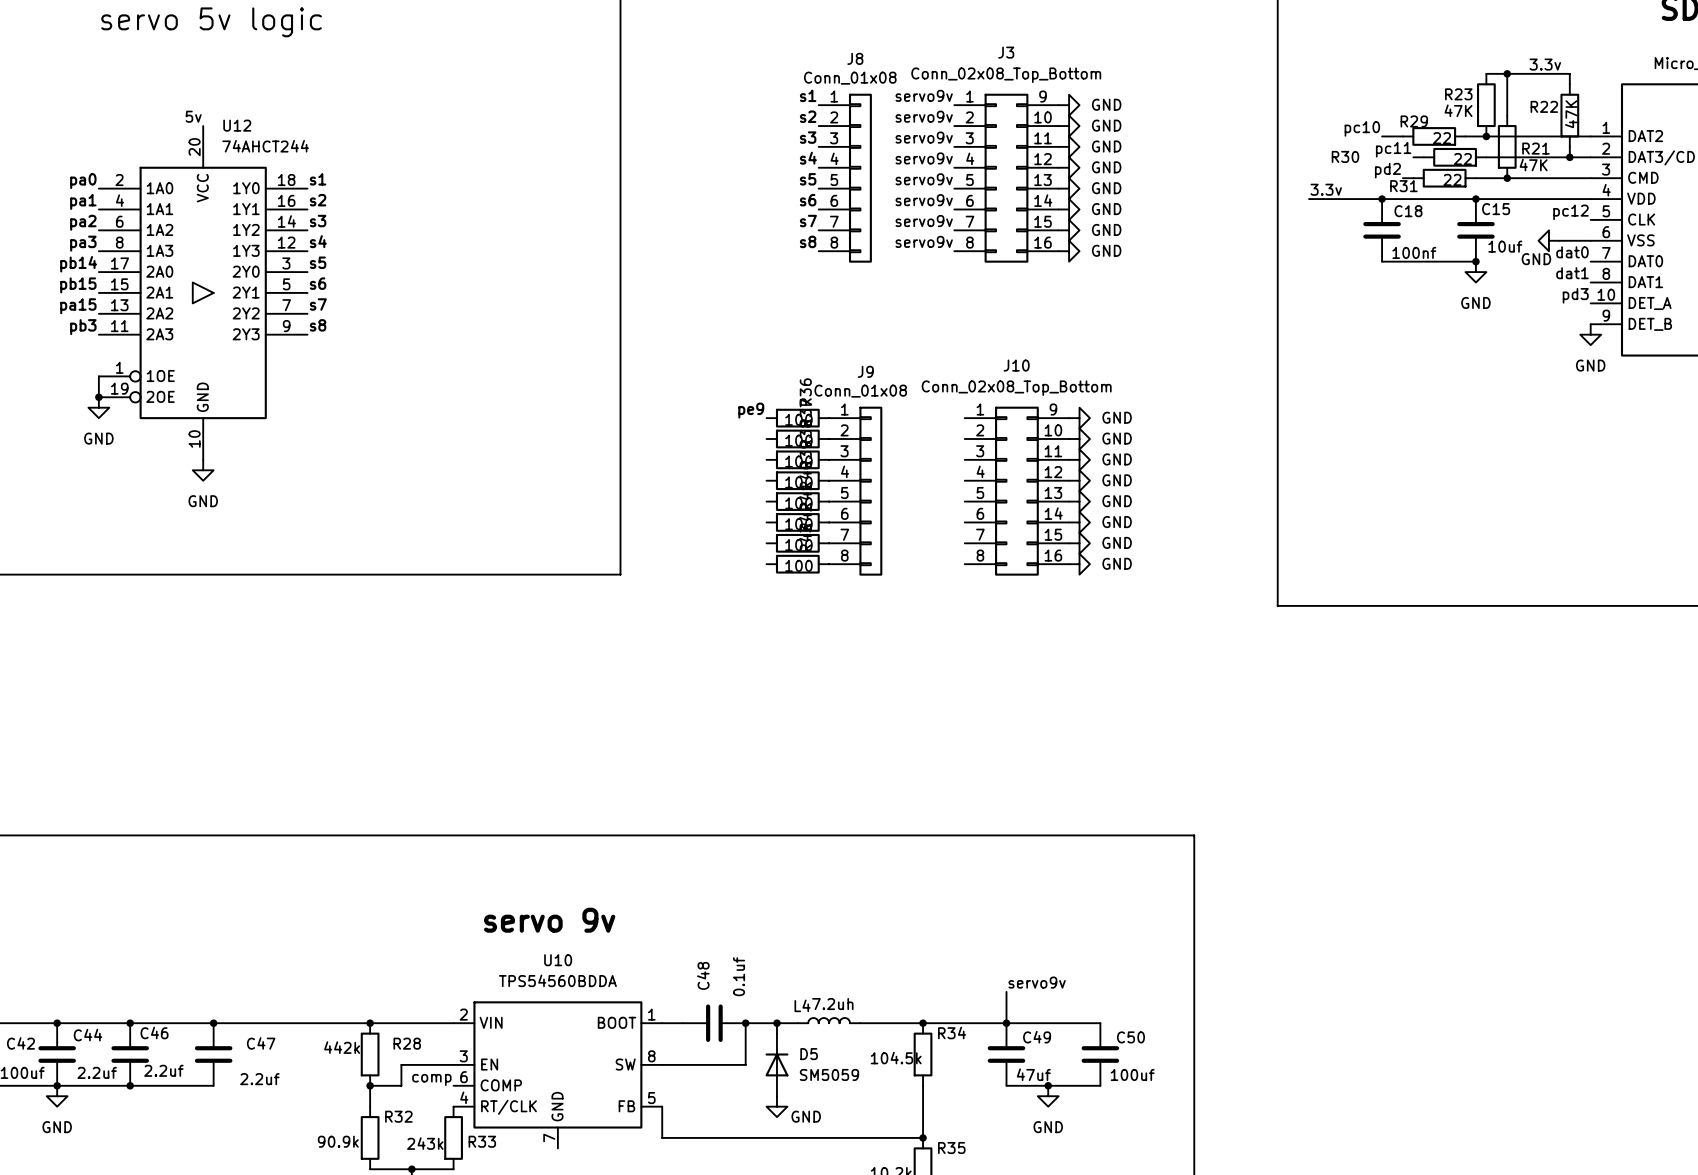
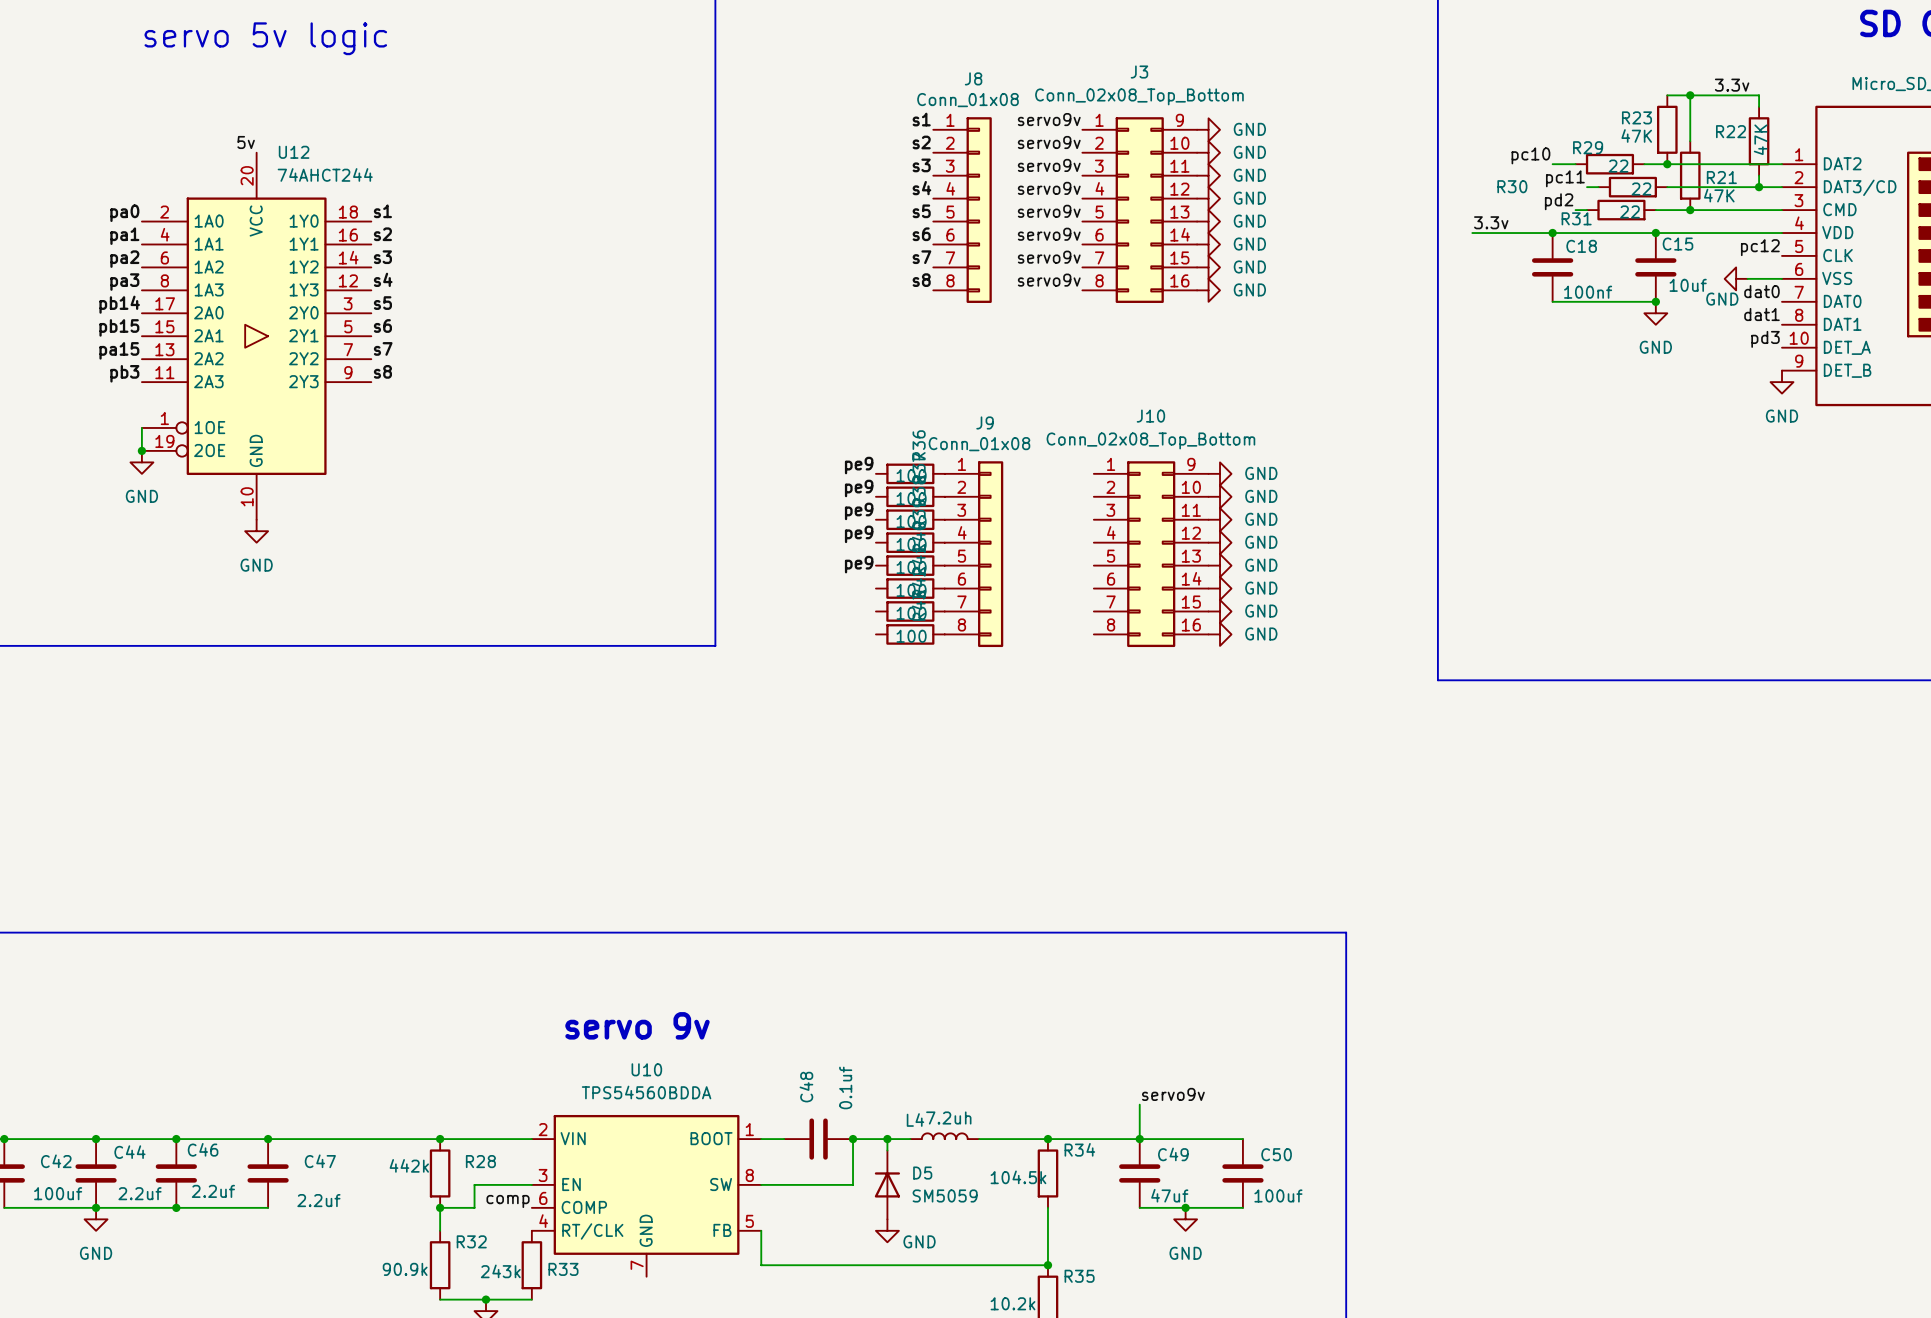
label: none -> pe9 (859, 488)
label: none -> pe9 (859, 511)
label: none -> pe9 (859, 534)
label: none -> pe9 (859, 564)

